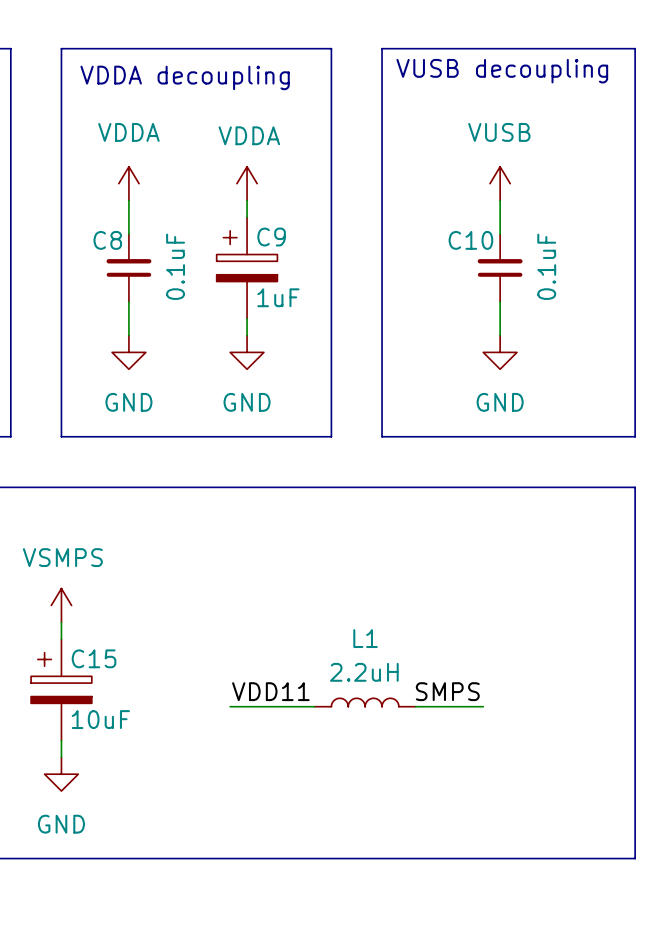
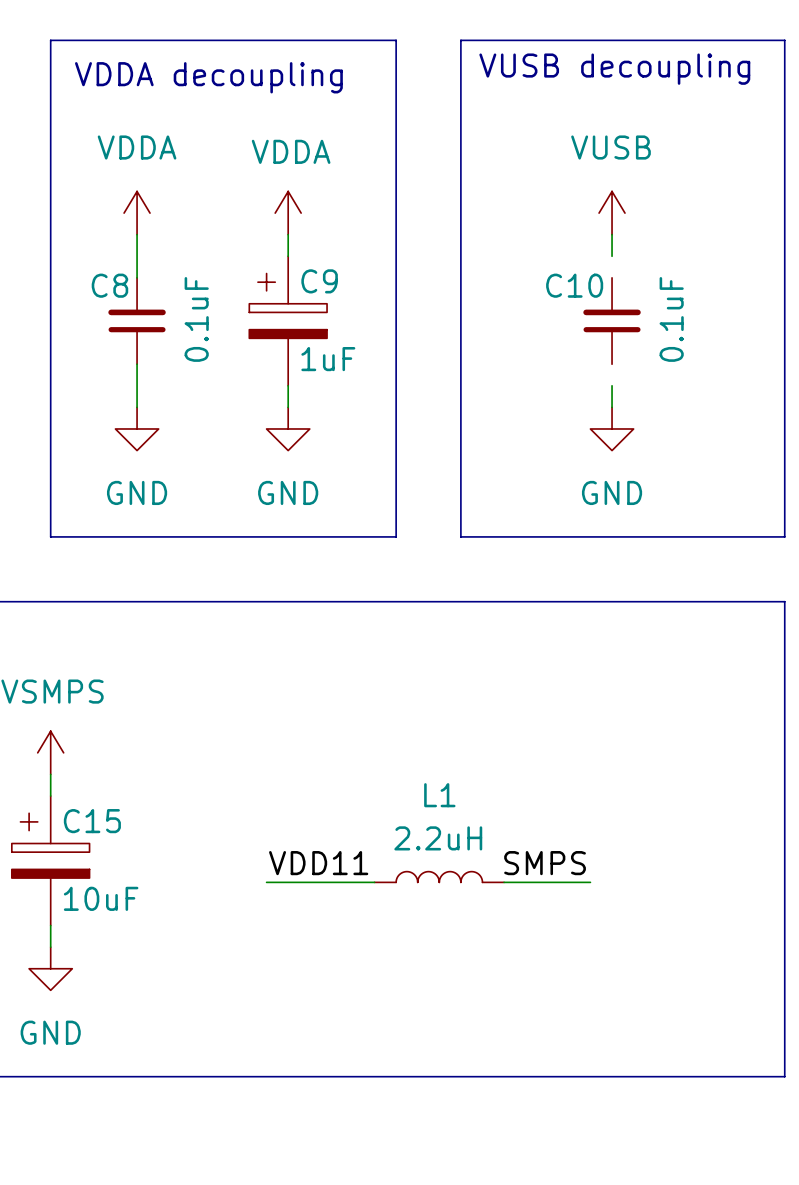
wire: (500, 217) (500, 234) -> none
wire: (500, 301) (500, 318) -> none

